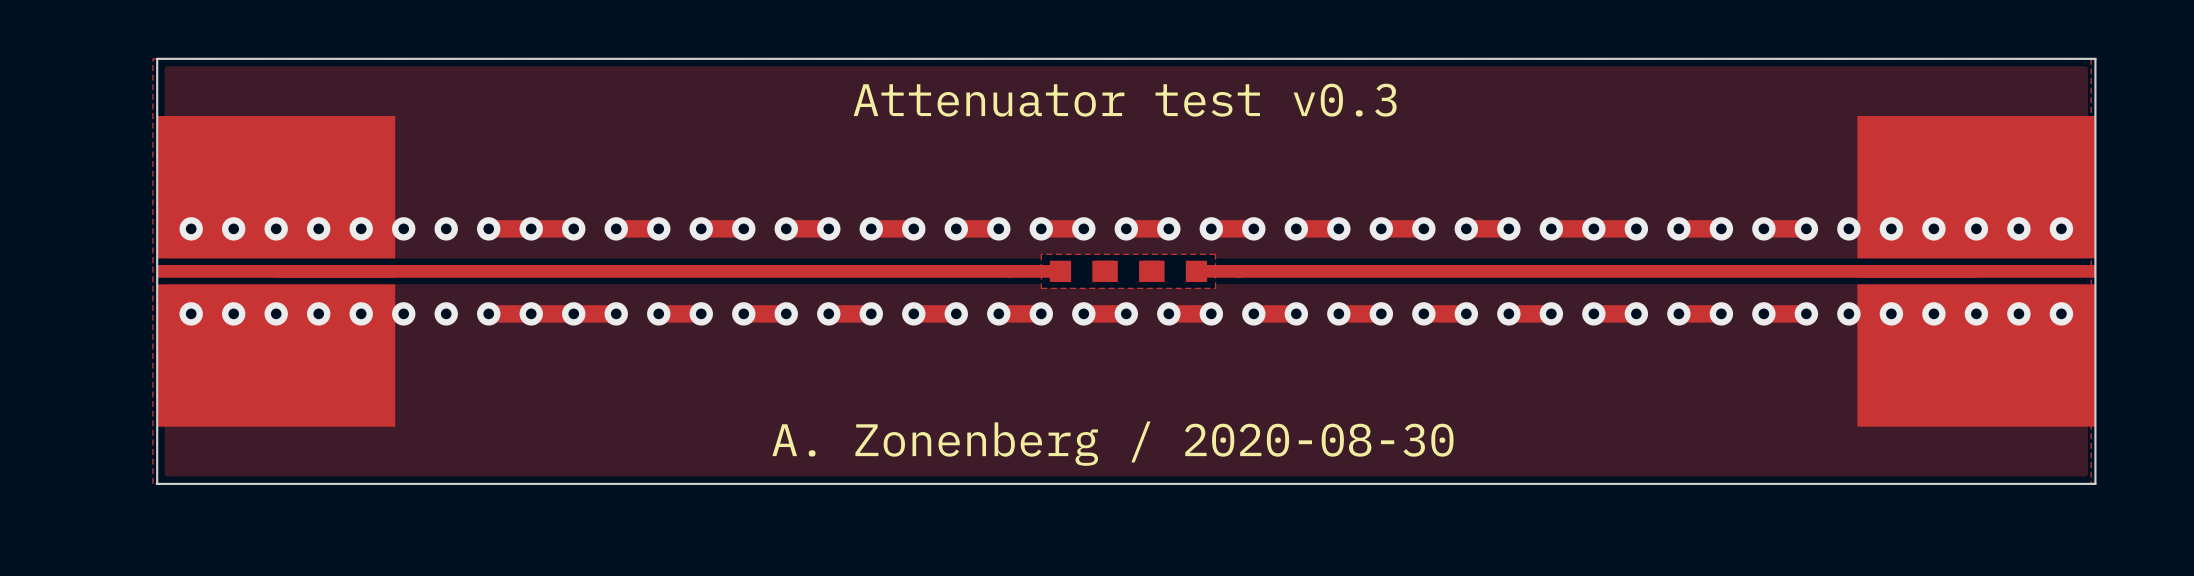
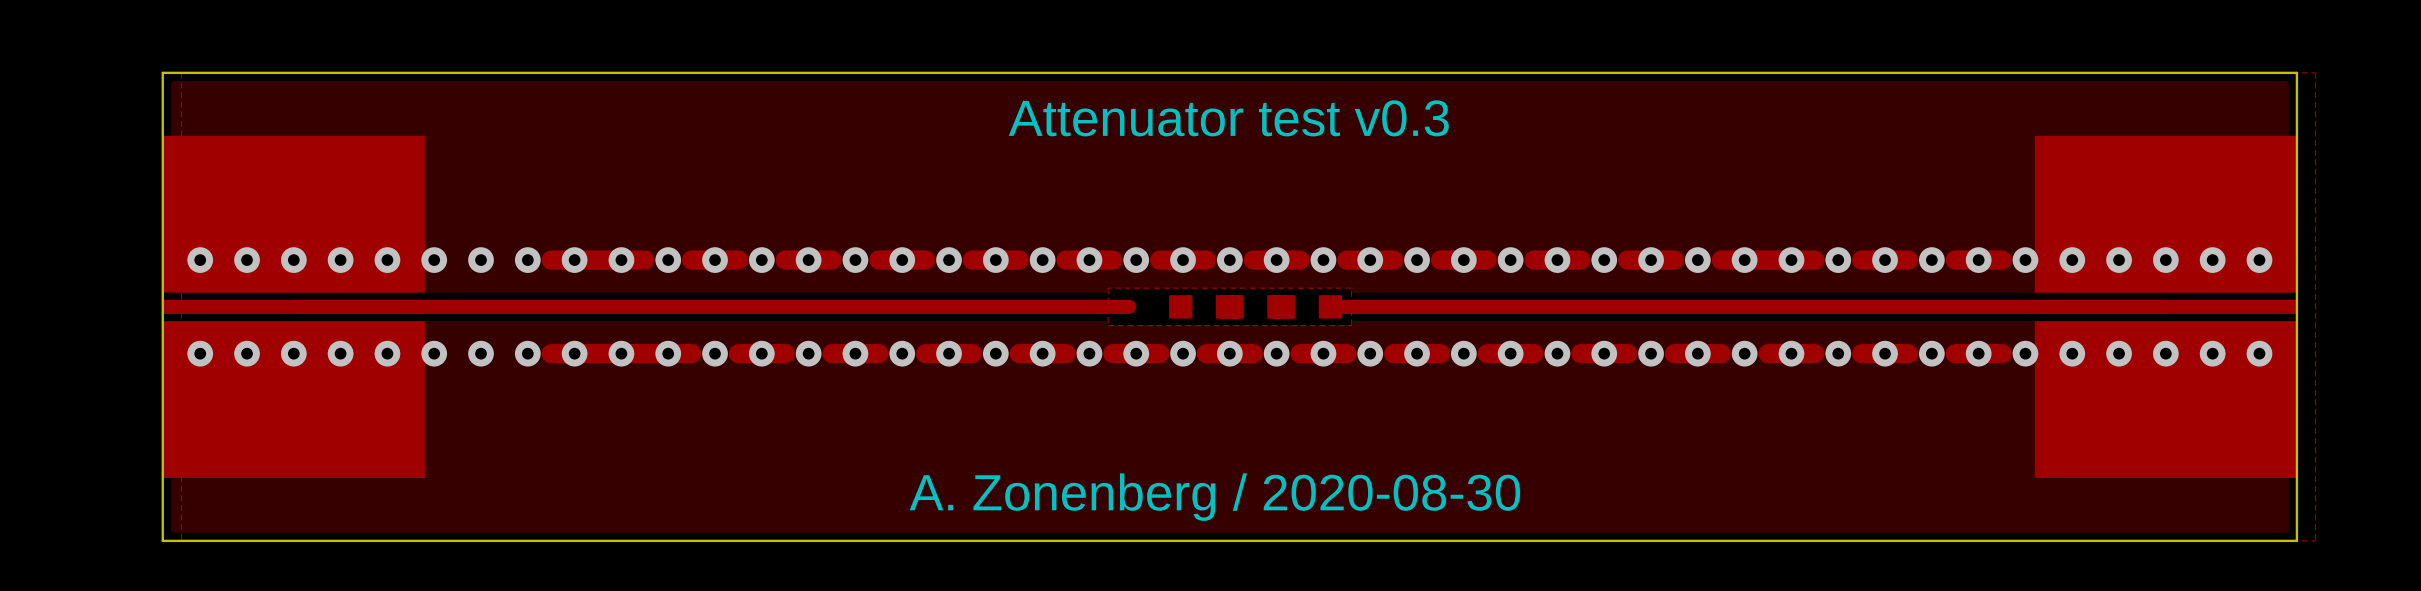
board edge: (157, 58) (157, 483) -> (186, 72) (162, 72) (162, 540) (186, 540)
board edge: (2074, 58) (2095, 58) (2095, 483) (2074, 483) -> (2296, 72) (2296, 540)
text position: Attenuator test v0.3 (1125, 100) -> Attenuator test v0.3 (1228, 118)
via: none -> (200, 260)
via: (191, 228) -> none
via: none -> (247, 260)
via: (233, 228) -> none
via: none -> (293, 260)
via: (276, 228) -> none
via: none -> (340, 260)
via: (318, 228) -> none
via: none -> (387, 260)
via: (361, 228) -> none
via: none -> (434, 260)
via: (403, 228) -> none
via: none -> (481, 260)
via: (446, 228) -> none
via: none -> (527, 260)
via: (488, 228) -> none
via: none -> (574, 260)
via: (531, 228) -> none
via: none -> (621, 260)
via: (573, 228) -> none
via: none -> (668, 260)
via: (616, 228) -> none
via: none -> (715, 260)
via: (658, 228) -> none
via: none -> (761, 260)
via: (701, 228) -> none
via: none -> (808, 260)
via: (743, 228) -> none
via: none -> (855, 260)
via: (786, 228) -> none
via: none -> (902, 260)
via: (828, 228) -> none
via: none -> (949, 260)
via: (871, 228) -> none
via: none -> (995, 260)
via: (913, 228) -> none
via: none -> (1042, 260)
via: (956, 228) -> none
via: none -> (1089, 260)
via: (998, 228) -> none
via: none -> (1136, 260)
via: (1041, 228) -> none
via: none -> (1183, 260)
via: (1083, 228) -> none
via: none -> (1229, 260)
via: (1126, 228) -> none
via: none -> (1276, 260)
via: (1168, 228) -> none
via: none -> (1323, 260)
via: (1211, 228) -> none
via: none -> (1370, 260)
via: (1253, 228) -> none
via: none -> (1417, 260)
via: (1296, 228) -> none
via: none -> (1463, 260)
via: (1338, 228) -> none
via: none -> (1510, 260)
via: (1381, 228) -> none
via: none -> (1557, 260)
via: (1423, 228) -> none
via: none -> (1604, 260)
via: (1466, 228) -> none
via: none -> (1651, 260)
via: (1508, 228) -> none
via: none -> (1697, 260)
via: (1551, 228) -> none
via: none -> (1744, 260)
via: (1593, 228) -> none
via: none -> (1791, 260)
via: (1636, 228) -> none
via: none -> (1838, 260)
via: (1678, 228) -> none
via: none -> (1885, 260)
via: (1721, 228) -> none
via: none -> (1931, 260)
via: (1763, 228) -> none
via: none -> (1978, 260)
via: (1806, 228) -> none
via: none -> (2025, 260)
via: (1848, 228) -> none
via: none -> (2072, 260)
via: (1891, 228) -> none
via: none -> (2119, 260)
via: (1933, 228) -> none
via: none -> (2165, 260)
via: (1976, 228) -> none
via: none -> (2212, 260)
via: (2018, 228) -> none
via: none -> (2259, 260)
via: (2061, 228) -> none
top zone outline: (1041, 254) (1041, 288) -> (1159, 288) (1108, 288) (1108, 325) (1159, 325)
part position: (276, 271) -> (293, 306)
top track: (1013, 271) (1060, 271) -> none
part position: (1976, 271) -> (2165, 306)
via: none -> (200, 353)
via: (191, 313) -> none
via: none -> (247, 353)
via: (233, 313) -> none
via: none -> (293, 353)
via: (276, 313) -> none
via: none -> (340, 353)
via: (318, 313) -> none
via: none -> (387, 353)
via: (361, 313) -> none
via: none -> (434, 353)
via: (403, 313) -> none
via: none -> (481, 353)
via: (446, 313) -> none
via: none -> (527, 353)
via: (488, 313) -> none
via: none -> (574, 353)
via: (531, 313) -> none
via: none -> (621, 353)
via: (573, 313) -> none
via: none -> (668, 353)
via: (616, 313) -> none
via: none -> (715, 353)
via: (658, 313) -> none
via: none -> (761, 353)
via: (701, 313) -> none
via: none -> (808, 353)
via: (743, 313) -> none
via: none -> (855, 353)
via: (786, 313) -> none
via: none -> (902, 353)
via: (828, 313) -> none
via: none -> (949, 353)
via: (871, 313) -> none
via: none -> (995, 353)
via: (913, 313) -> none
via: none -> (1042, 353)
via: (956, 313) -> none
via: none -> (1089, 353)
via: (998, 313) -> none
via: none -> (1136, 353)
via: (1041, 313) -> none
via: none -> (1183, 353)
via: (1083, 313) -> none
via: none -> (1229, 353)
via: (1126, 313) -> none
via: none -> (1276, 353)
via: (1168, 313) -> none
via: none -> (1323, 353)
via: (1211, 313) -> none
via: none -> (1370, 353)
via: (1253, 313) -> none
via: none -> (1417, 353)
via: (1296, 313) -> none
via: none -> (1463, 353)
via: (1338, 313) -> none
via: none -> (1510, 353)
via: (1381, 313) -> none
via: none -> (1557, 353)
via: (1423, 313) -> none
via: none -> (1604, 353)
via: (1466, 313) -> none
via: none -> (1651, 353)
via: (1508, 313) -> none
via: none -> (1697, 353)
via: (1551, 313) -> none
via: none -> (1744, 353)
via: (1593, 313) -> none
via: none -> (1791, 353)
via: (1636, 313) -> none
via: none -> (1838, 353)
via: (1678, 313) -> none
via: none -> (1885, 353)
via: (1721, 313) -> none
via: none -> (1931, 353)
via: (1763, 313) -> none
via: none -> (1978, 353)
via: (1806, 313) -> none
via: none -> (2025, 353)
via: (1848, 313) -> none
via: none -> (2072, 353)
via: (1891, 313) -> none
via: none -> (2119, 353)
via: (1933, 313) -> none
via: none -> (2165, 353)
via: (1976, 313) -> none
via: none -> (2212, 353)
via: (2018, 313) -> none
via: none -> (2259, 353)
via: (2061, 313) -> none
text position: A. Zonenberg / 2020-08-30 (1112, 443) -> A. Zonenberg / 2020-08-30 (1214, 497)

